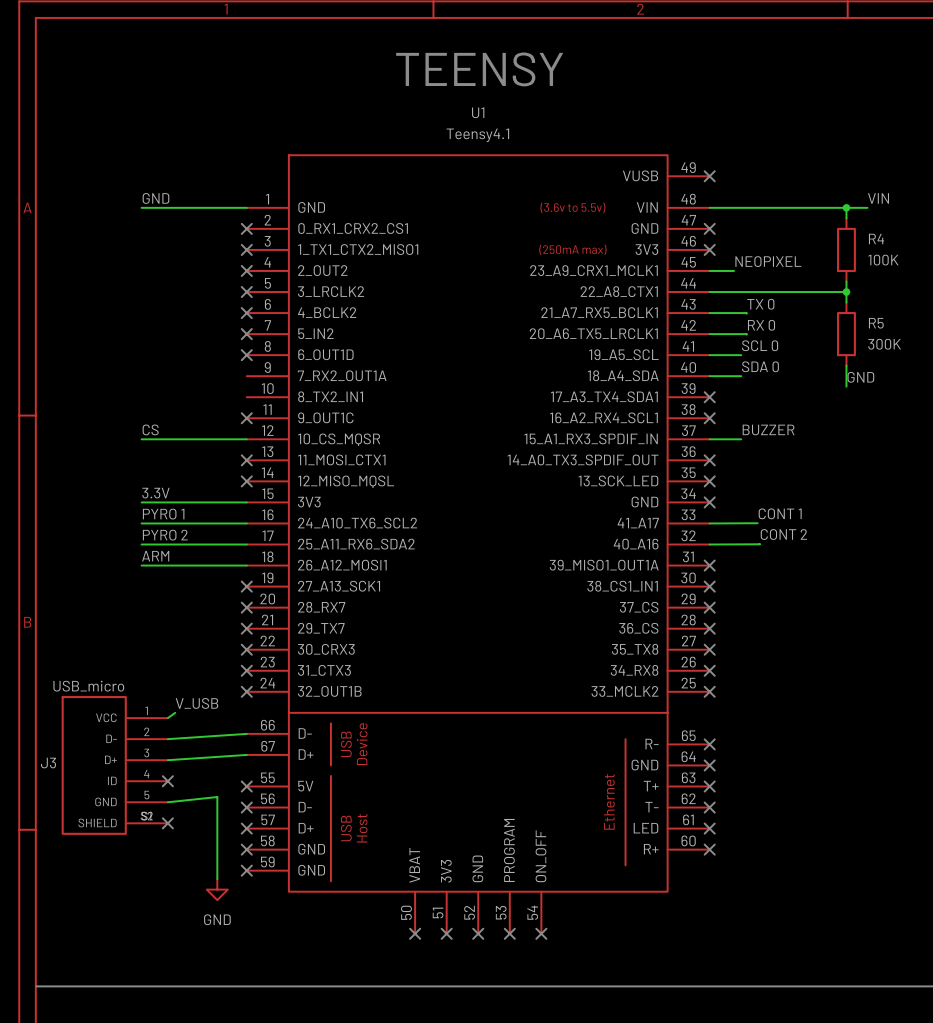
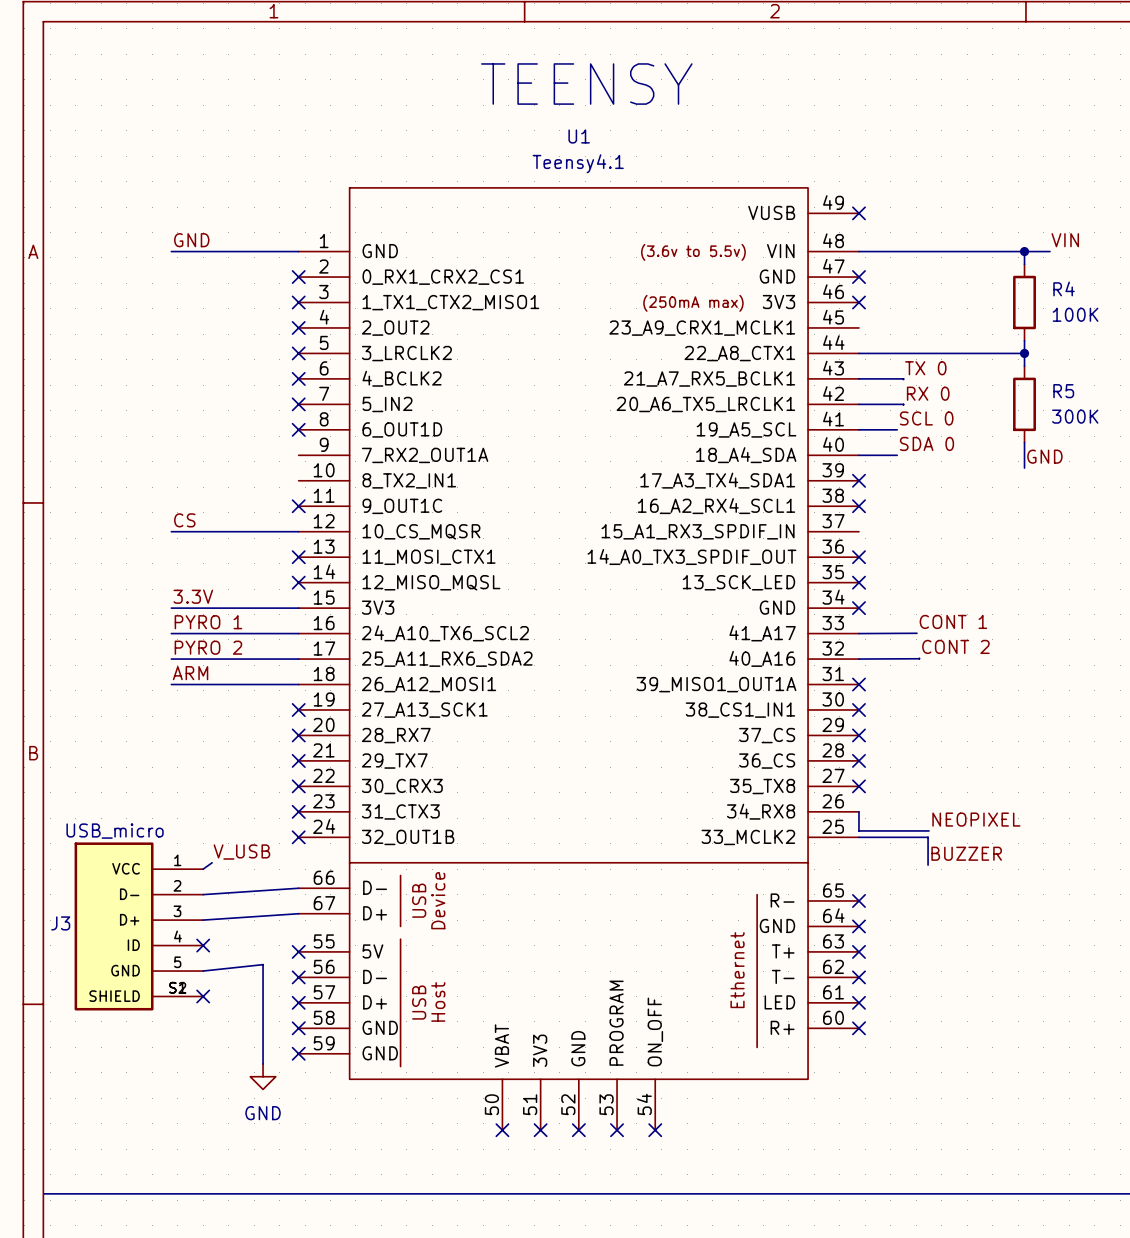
label: NEOPIXEL (768, 261) -> none
wire: (709, 270) (734, 270) -> none
label: BUZZER (768, 429) -> none
wire: (709, 439) (741, 439) -> none
wire: none -> (858, 811) (858, 830) (929, 830)
no-connect mark: (709, 670) -> none
label: none -> NEOPIXEL (976, 819)
wire: none -> (858, 837) (928, 837) (928, 865)
no-connect mark: (709, 691) -> none
label: none -> BUZZER (966, 853)

